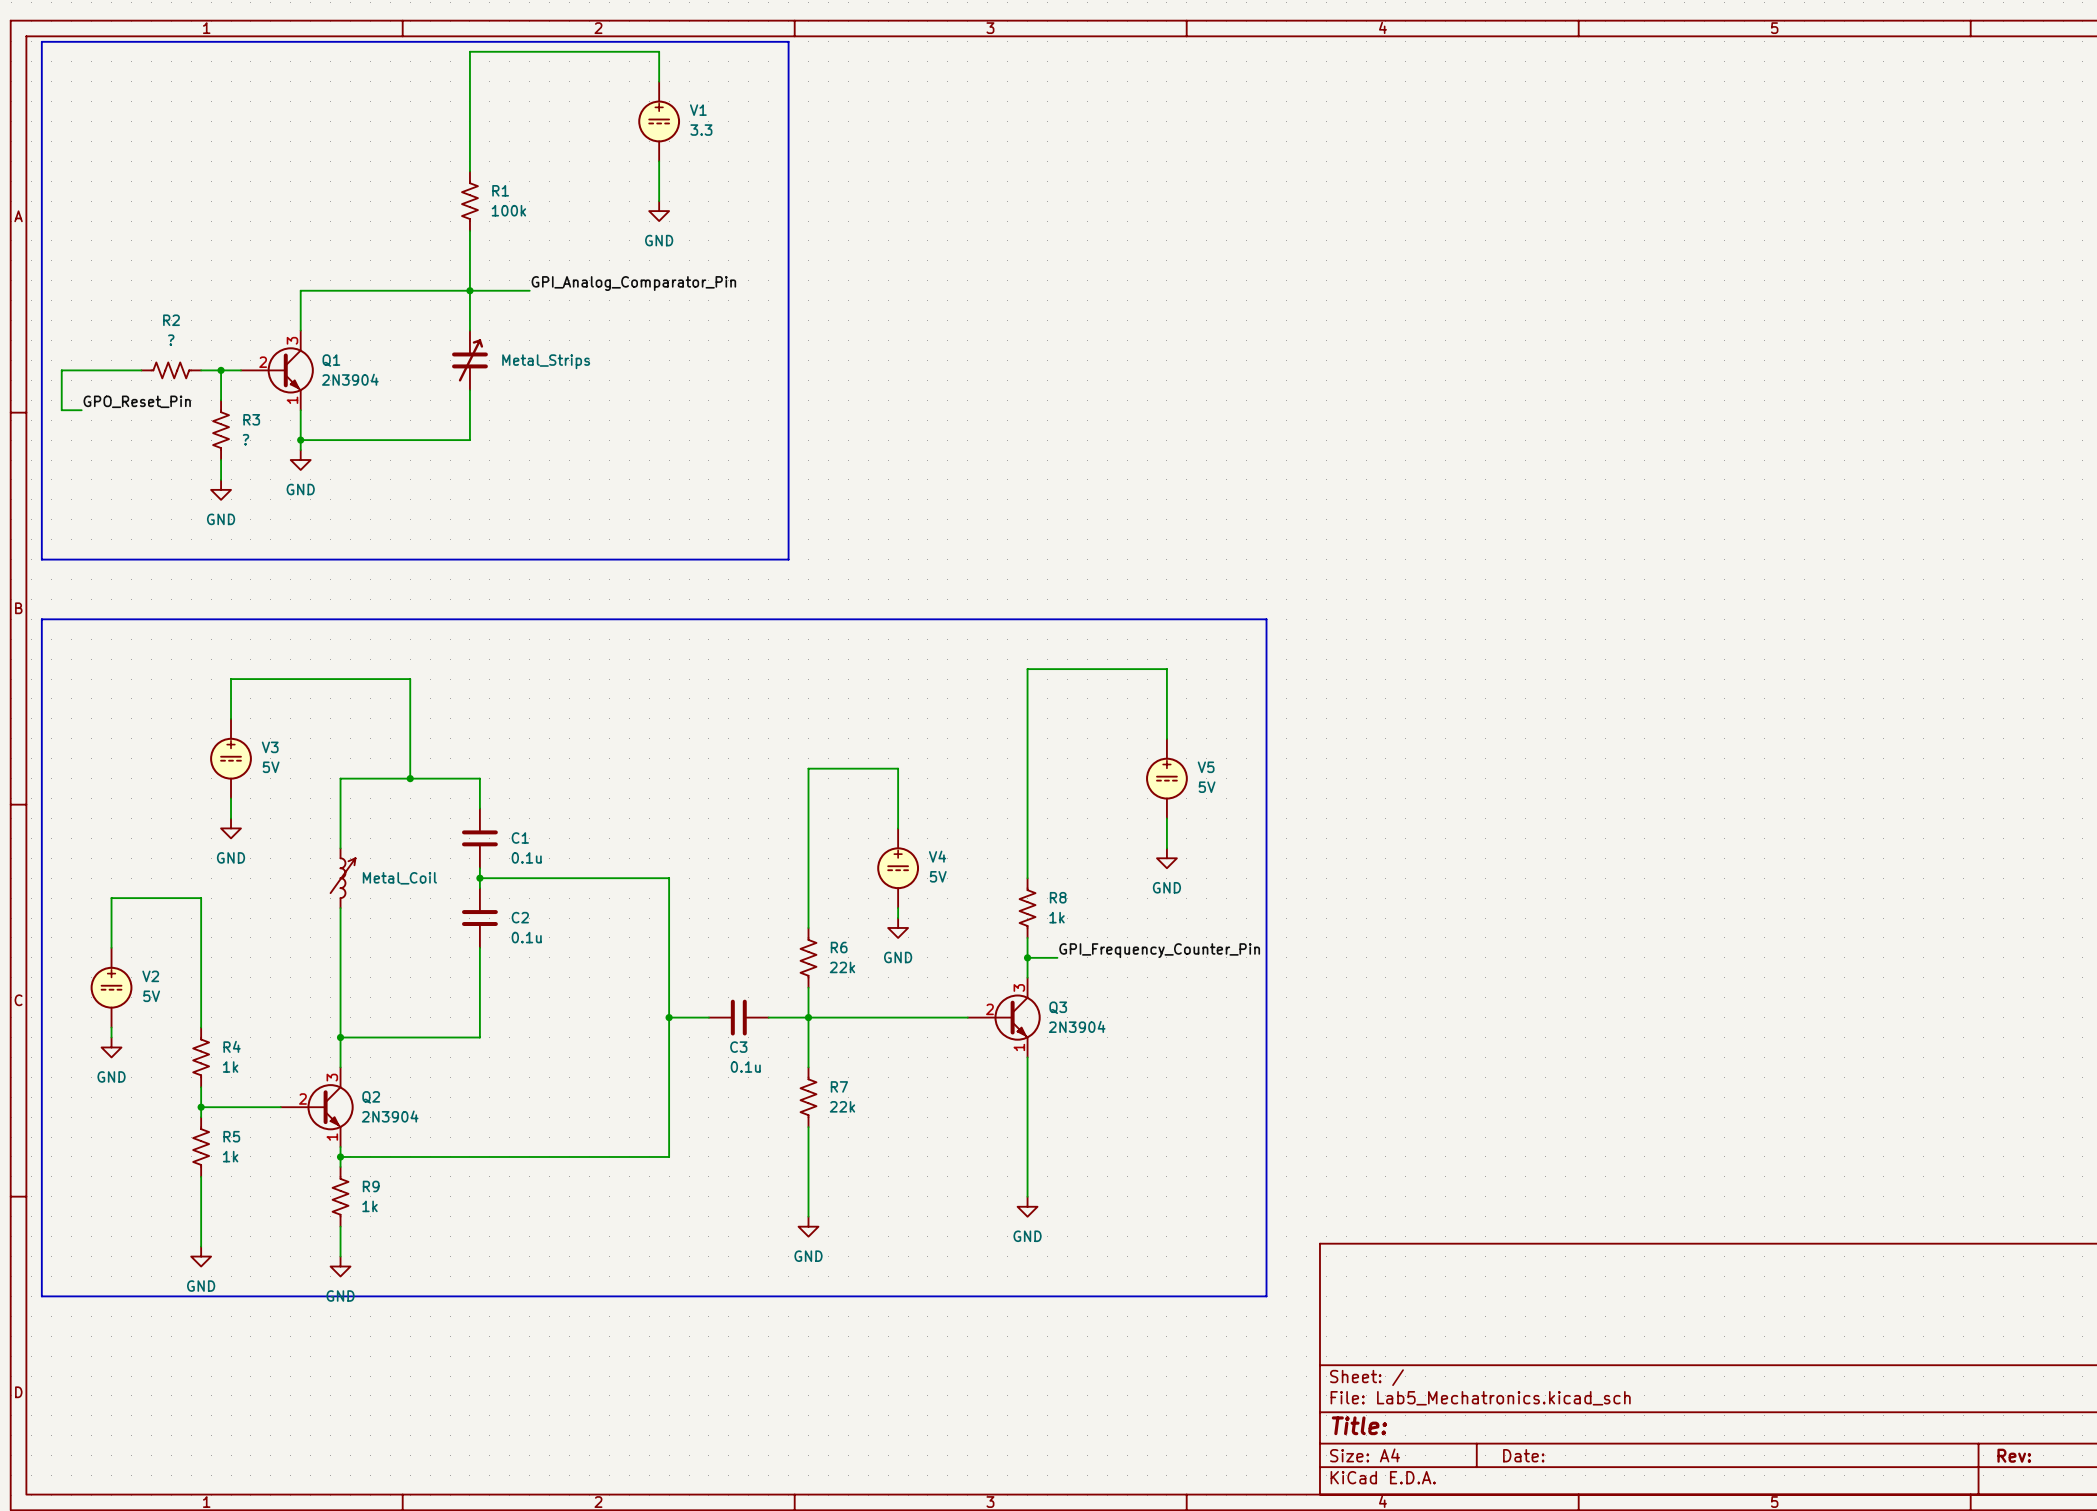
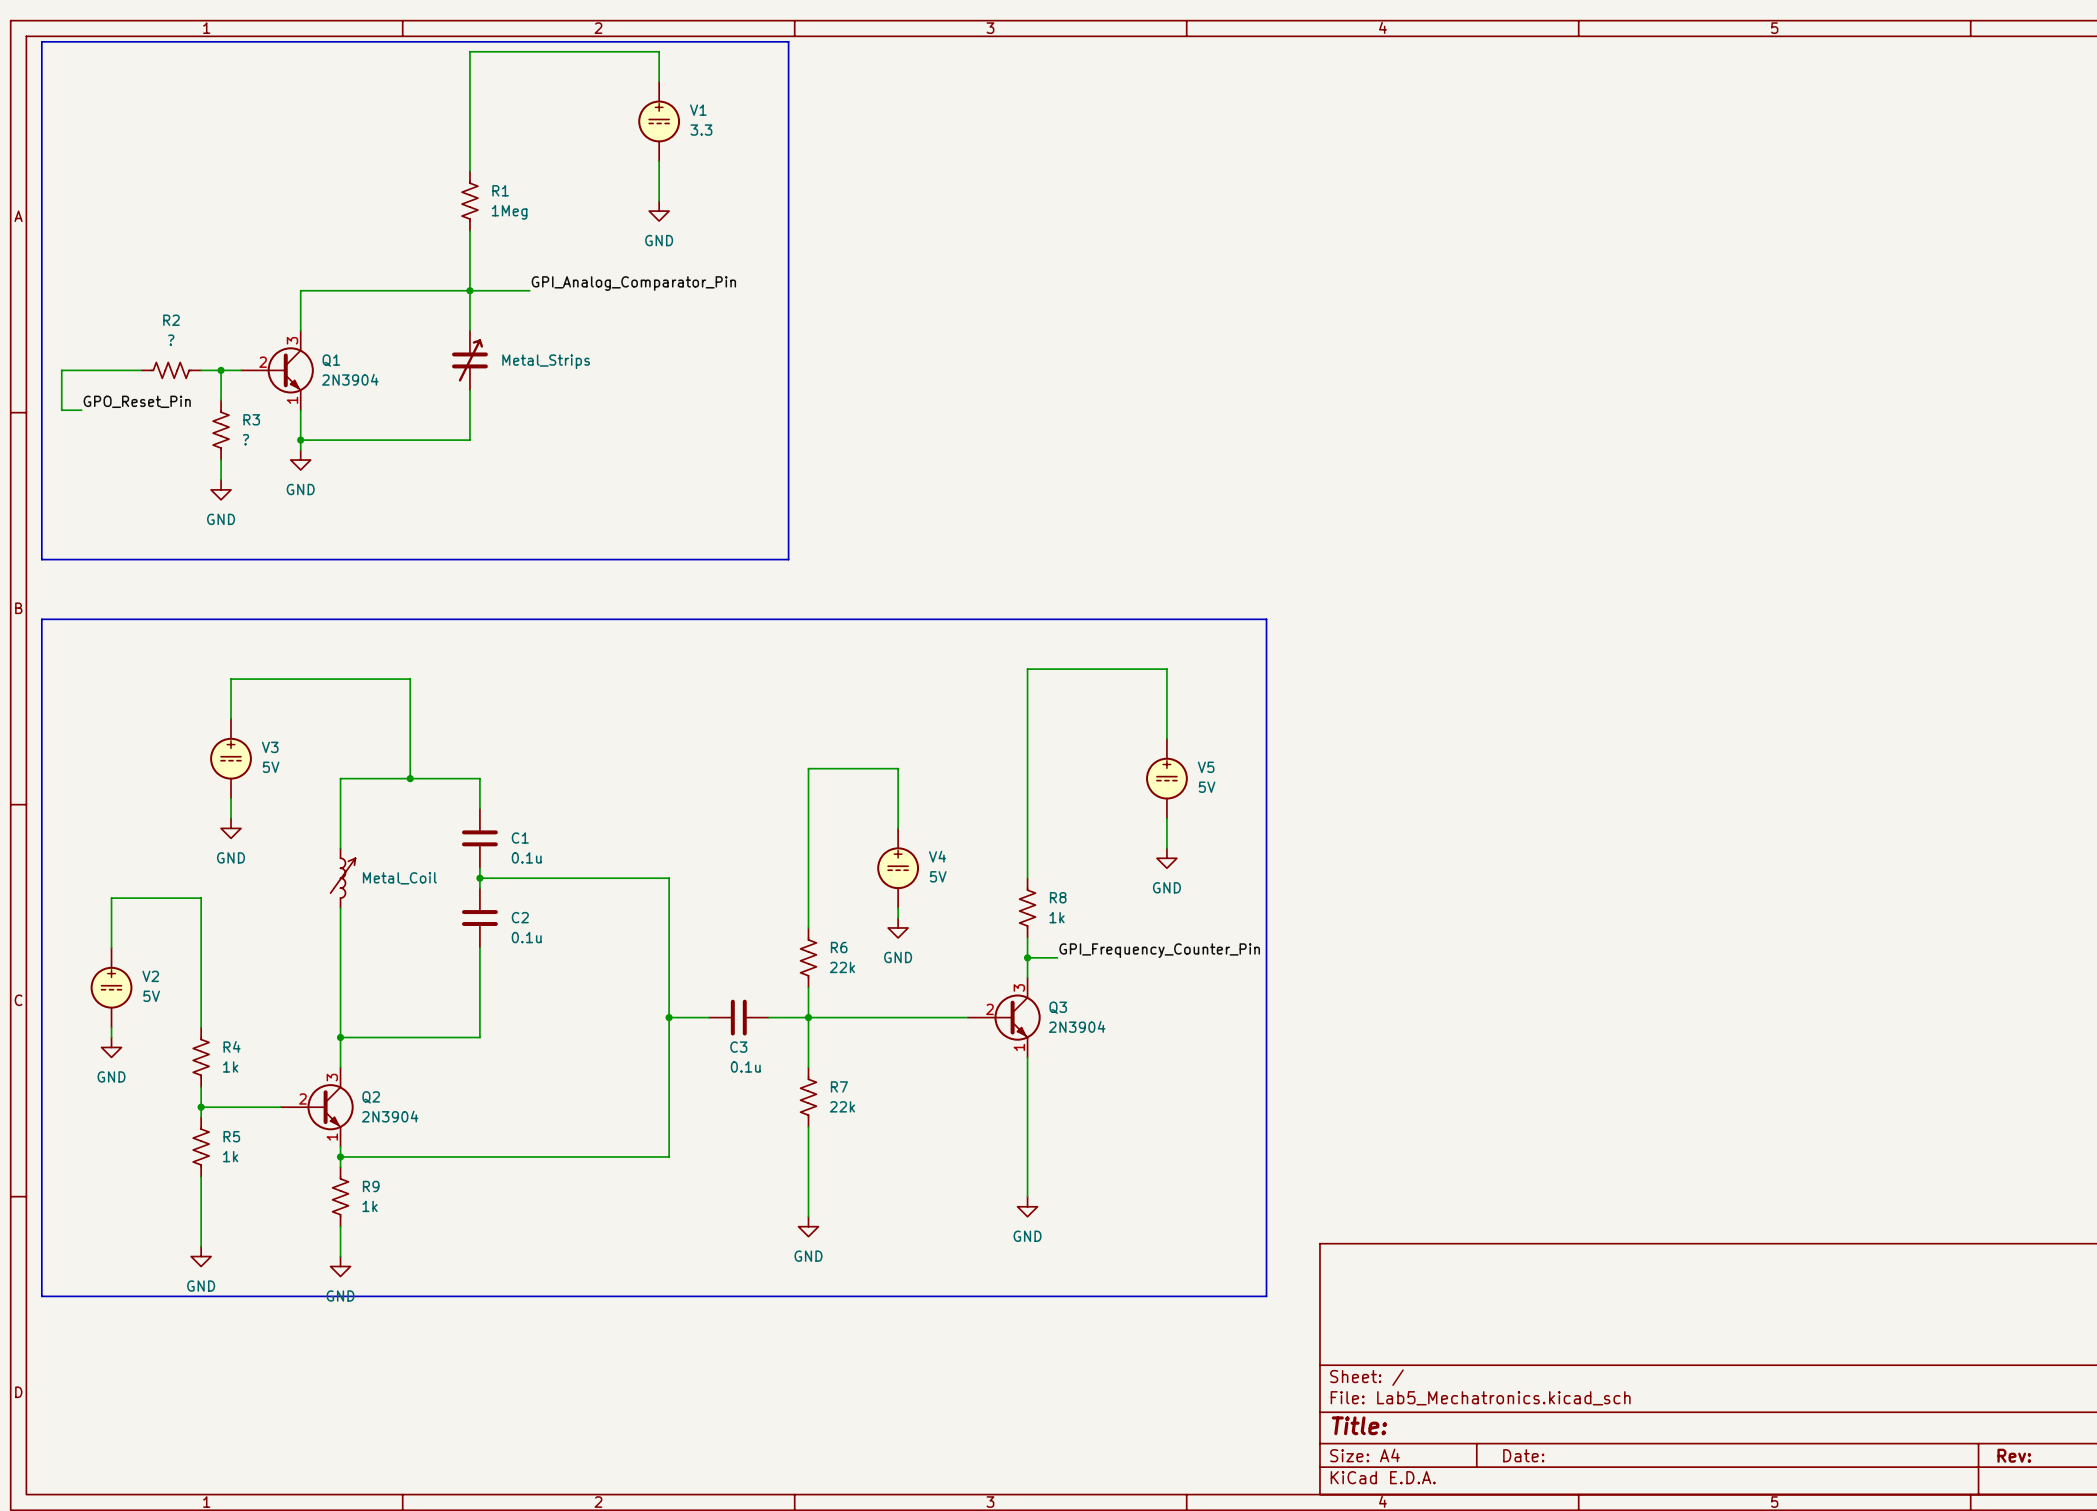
R1 value: 100k (508, 210) -> 1Meg (509, 212)

